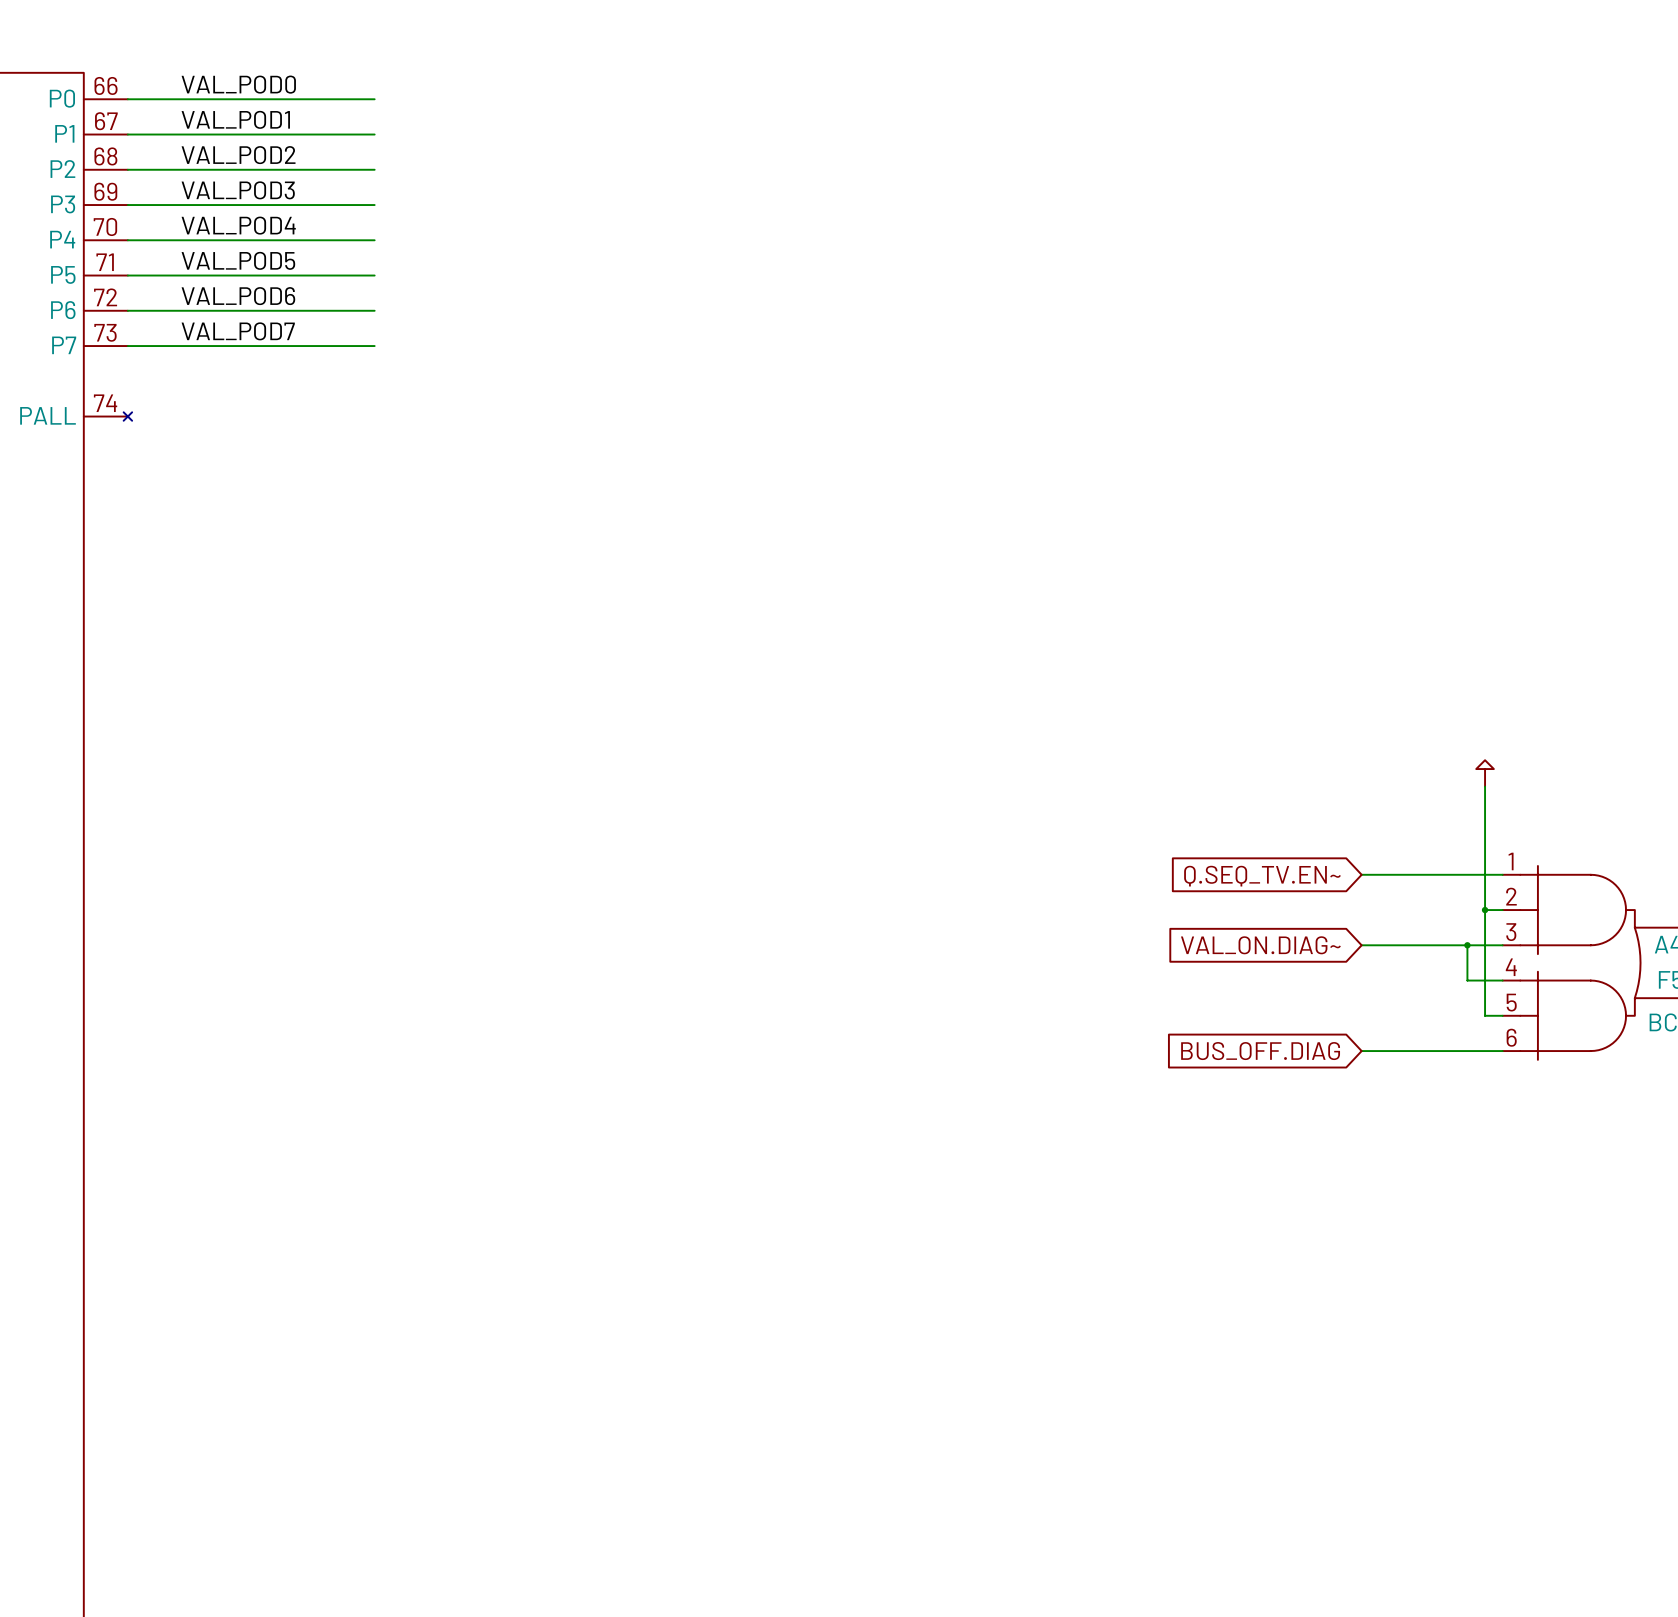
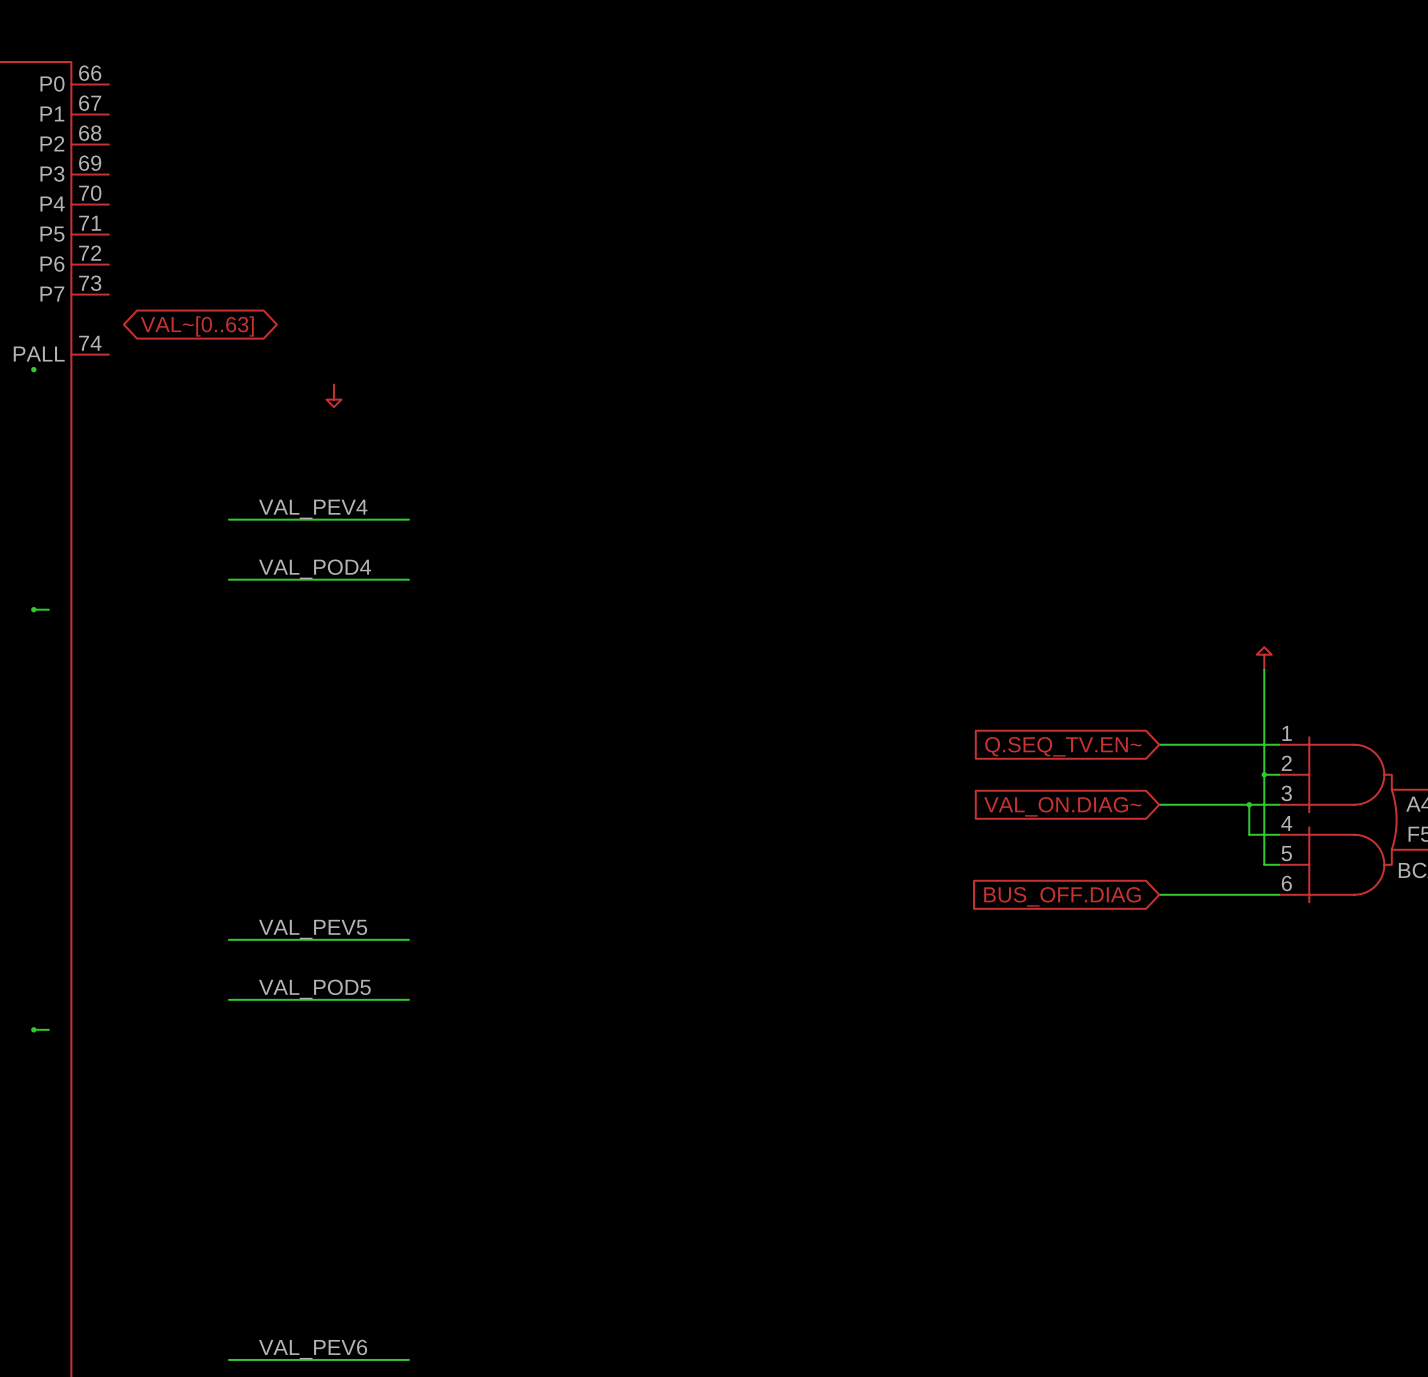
label: VAL_POD0 (238, 84) -> none
wire: (127, 99) (374, 99) -> none
label: VAL_POD1 (235, 119) -> none
wire: (127, 134) (374, 134) -> none
label: VAL_POD2 (238, 155) -> none
wire: (127, 169) (374, 169) -> none
label: VAL_POD3 (238, 190) -> none
wire: (127, 205) (374, 205) -> none
label: VAL_POD4 (238, 225) -> none
wire: (127, 240) (374, 240) -> none
label: VAL_POD5 (238, 260) -> none
wire: (127, 275) (374, 275) -> none
label: VAL_POD6 (238, 296) -> none
wire: (127, 310) (374, 310) -> none
label: VAL_POD7 (238, 331) -> none
wire: (127, 346) (374, 346) -> none
global label: none -> VAL~[0..63] (197, 326)
no-connect mark: (127, 416) -> none
junction: none -> (33, 369)
power symbol: none -> (333, 396)
label: none -> VAL_PEV4 (313, 509)
wire: none -> (228, 519) (408, 519)
label: none -> VAL_POD4 (315, 569)
wire: none -> (228, 579) (408, 579)
wire: none -> (33, 609) (48, 609)
junction: none -> (33, 609)
label: none -> VAL_PEV5 (313, 929)
wire: none -> (228, 939) (408, 939)
label: none -> VAL_POD5 (314, 989)
wire: none -> (228, 999) (408, 999)
wire: none -> (33, 1029) (48, 1029)
junction: none -> (33, 1029)
label: none -> VAL_PEV6 (313, 1349)
wire: none -> (228, 1359) (408, 1359)

